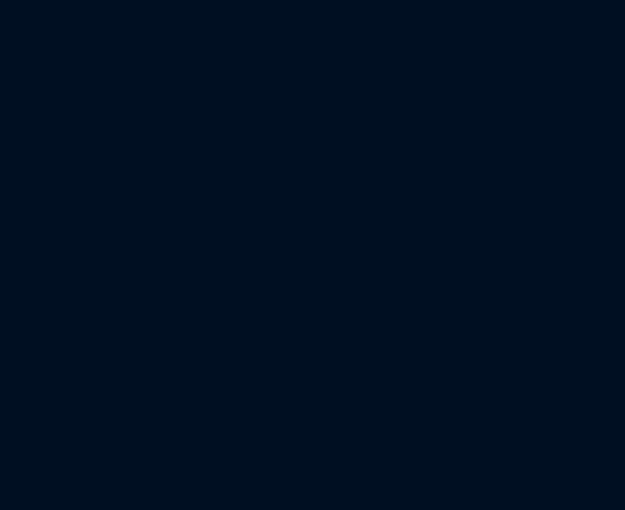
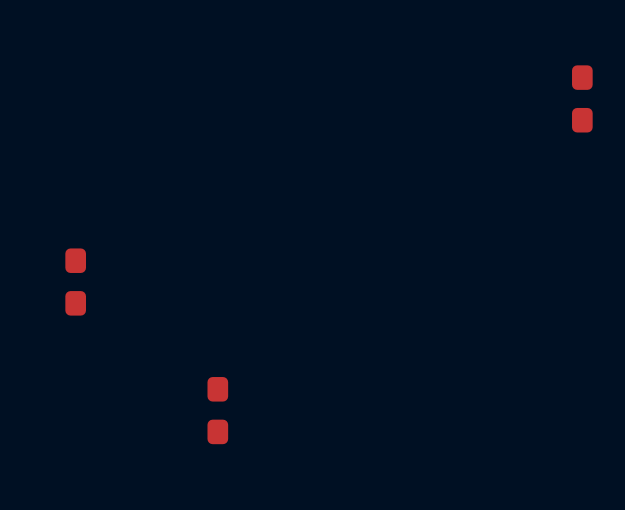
part: none -> (582, 98)
part: none -> (75, 282)
part: none -> (217, 410)

